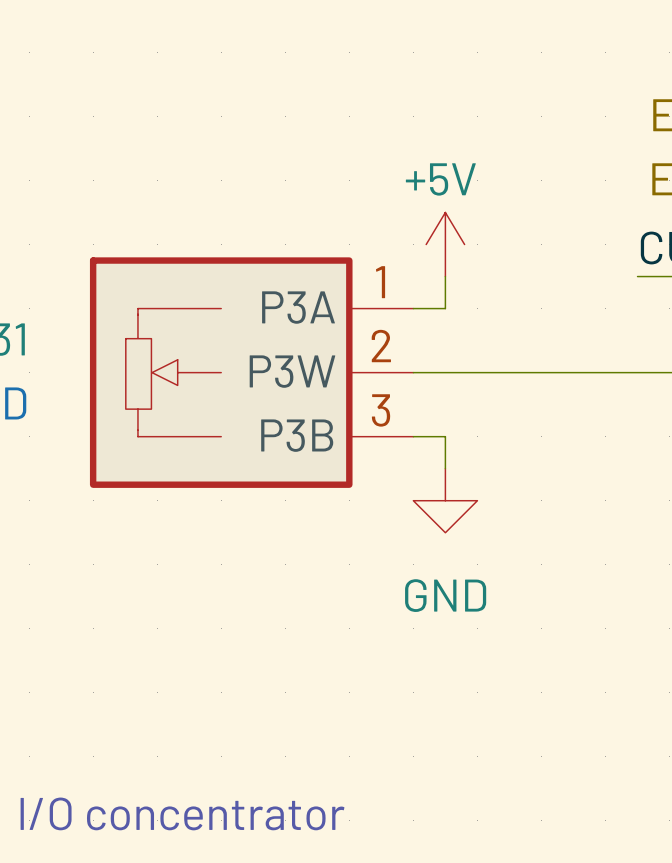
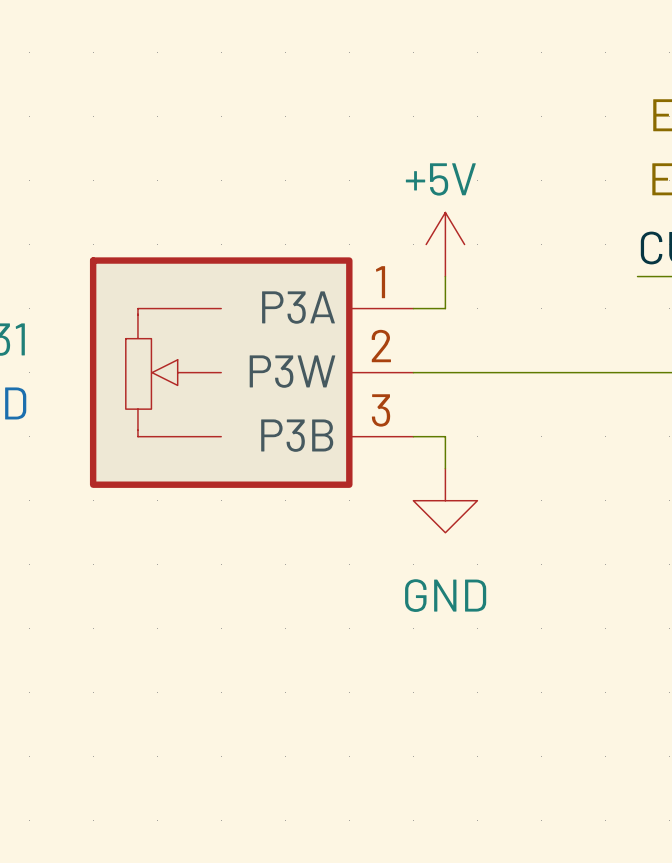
text: I/O concentrator (182, 813) -> none

